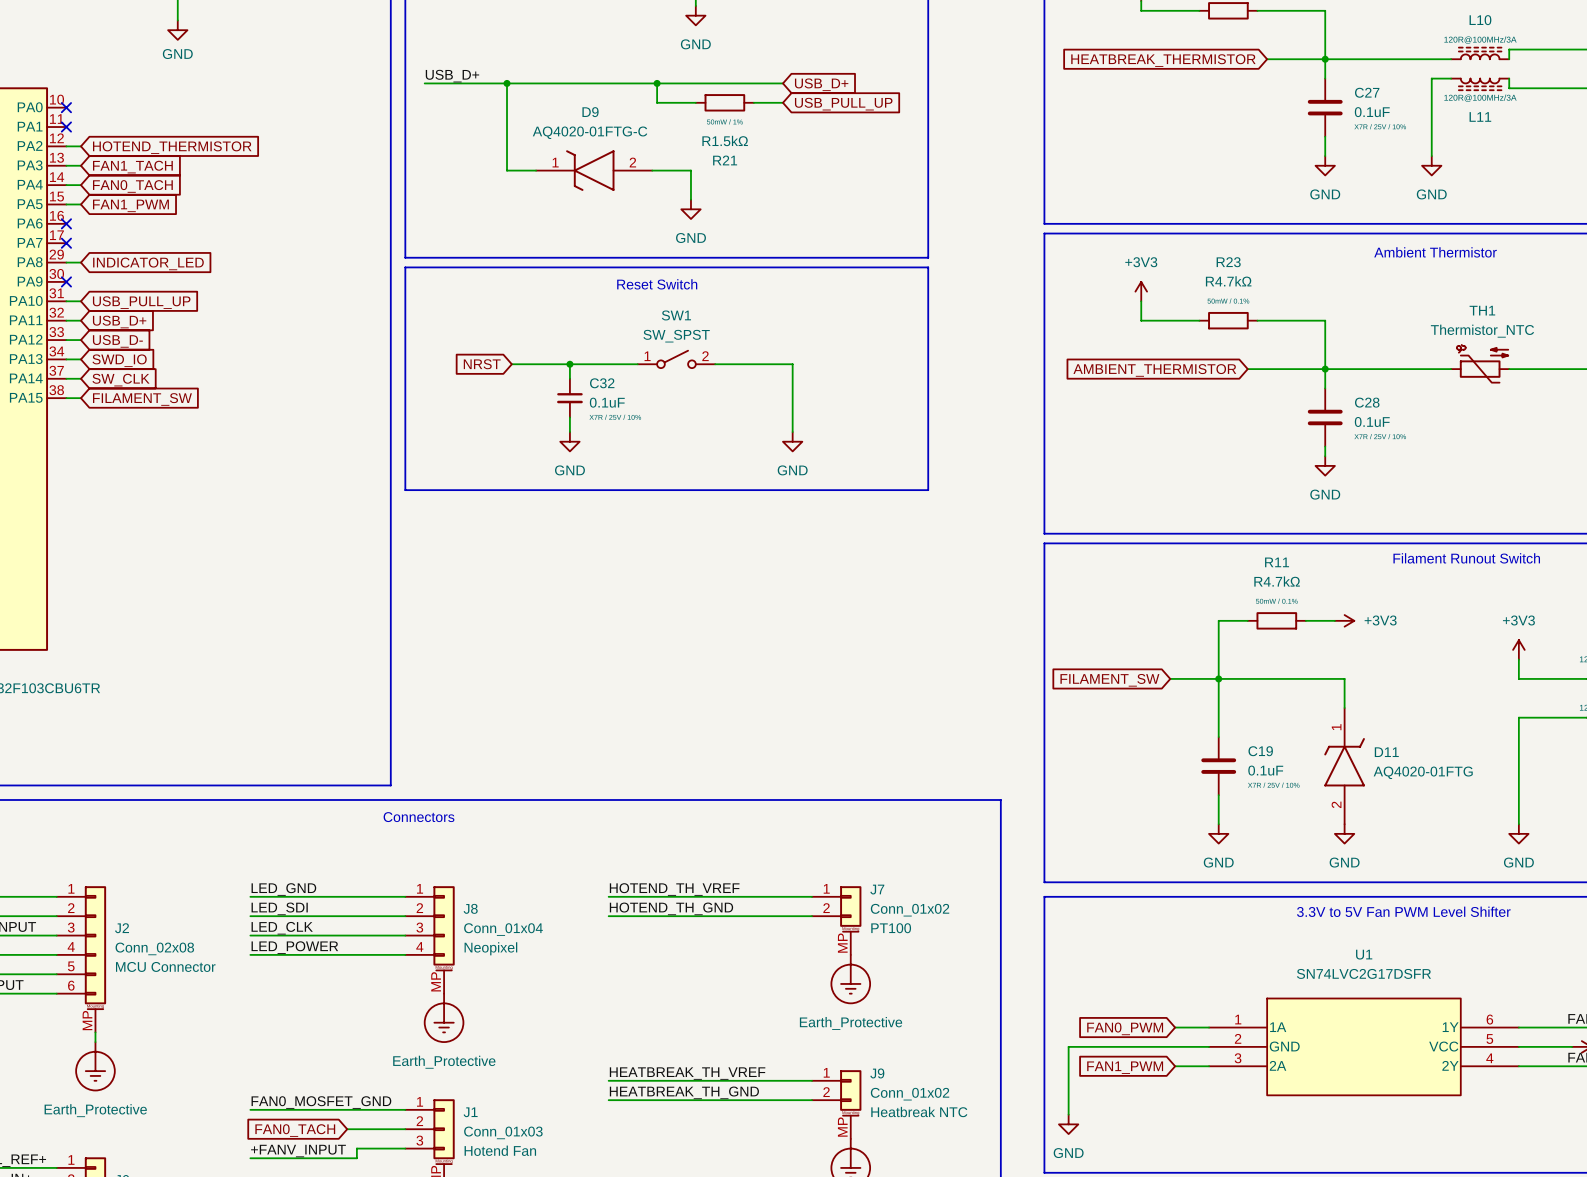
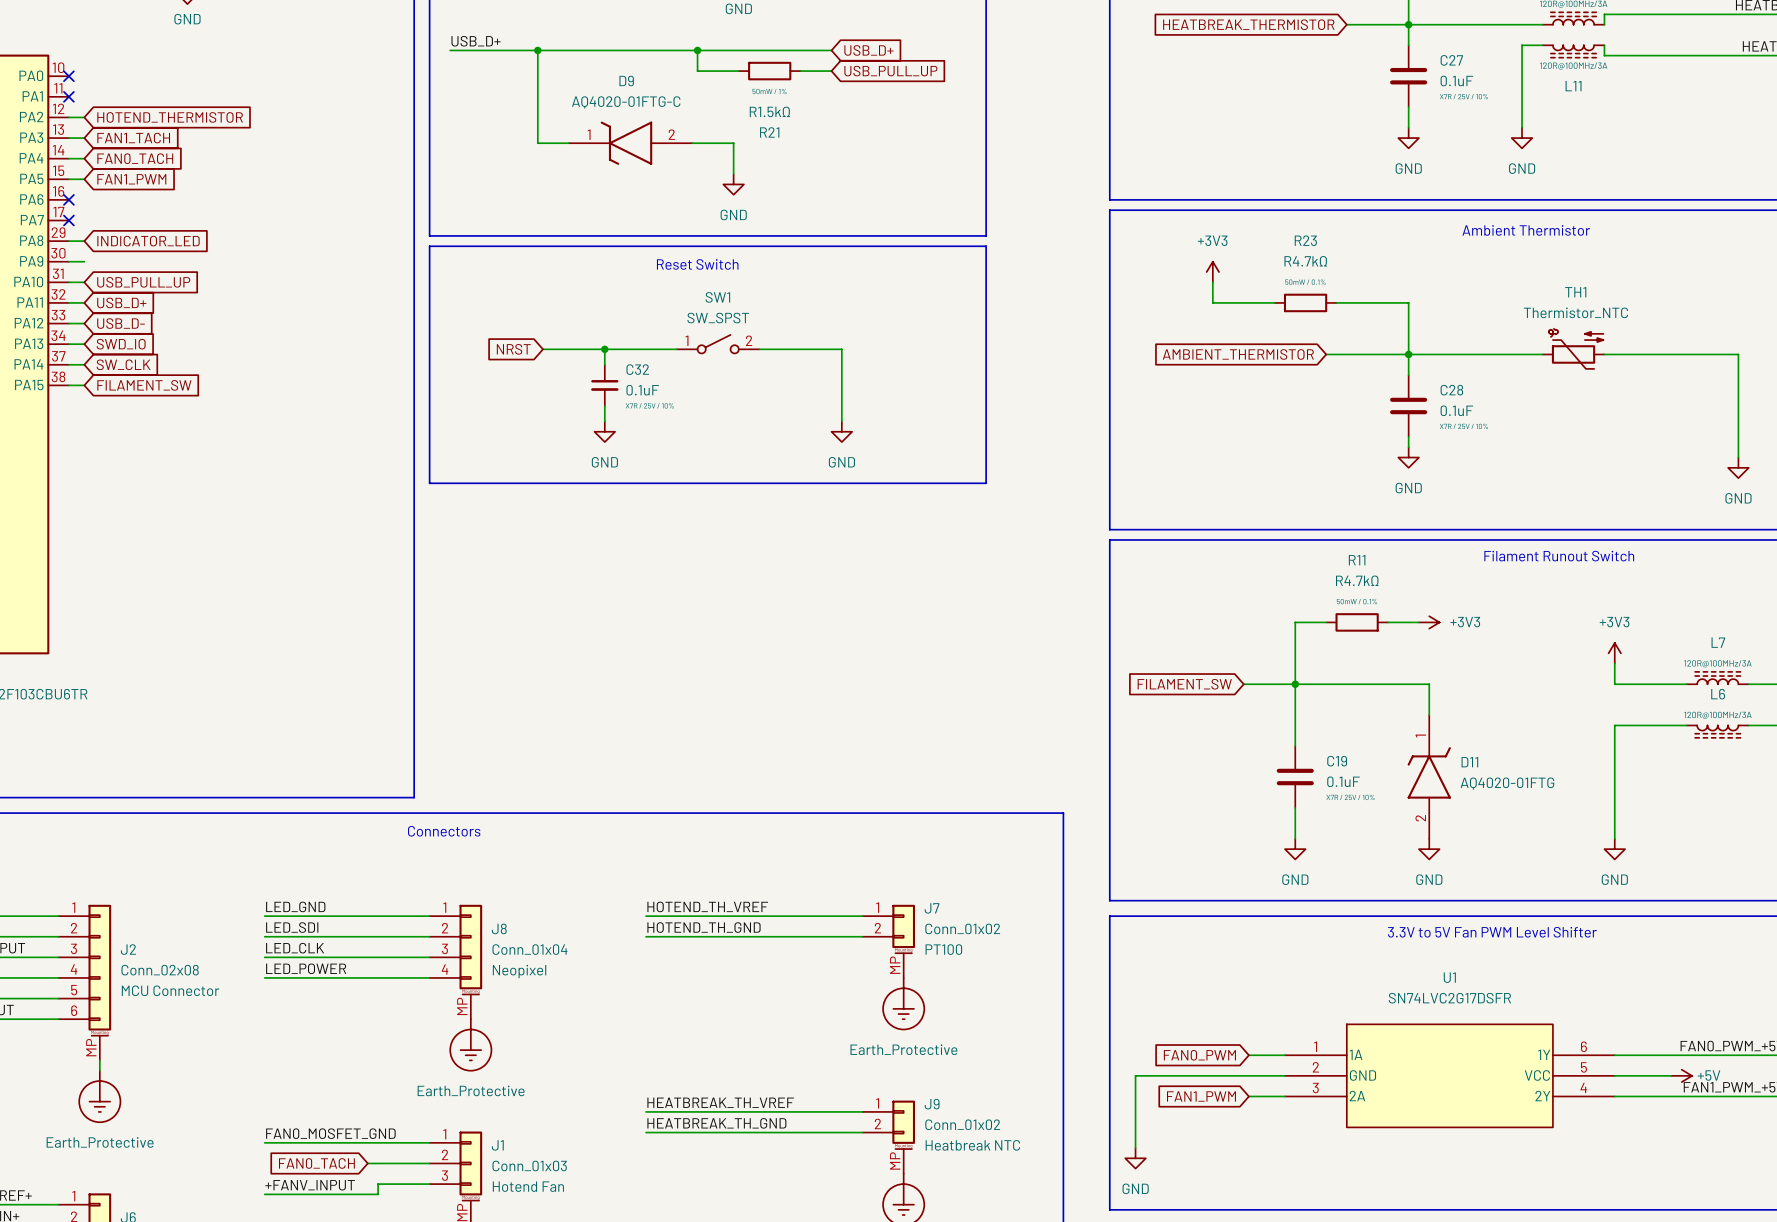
wire: none -> (68, 261) (84, 261)
no-connect mark: (66, 281) -> none

